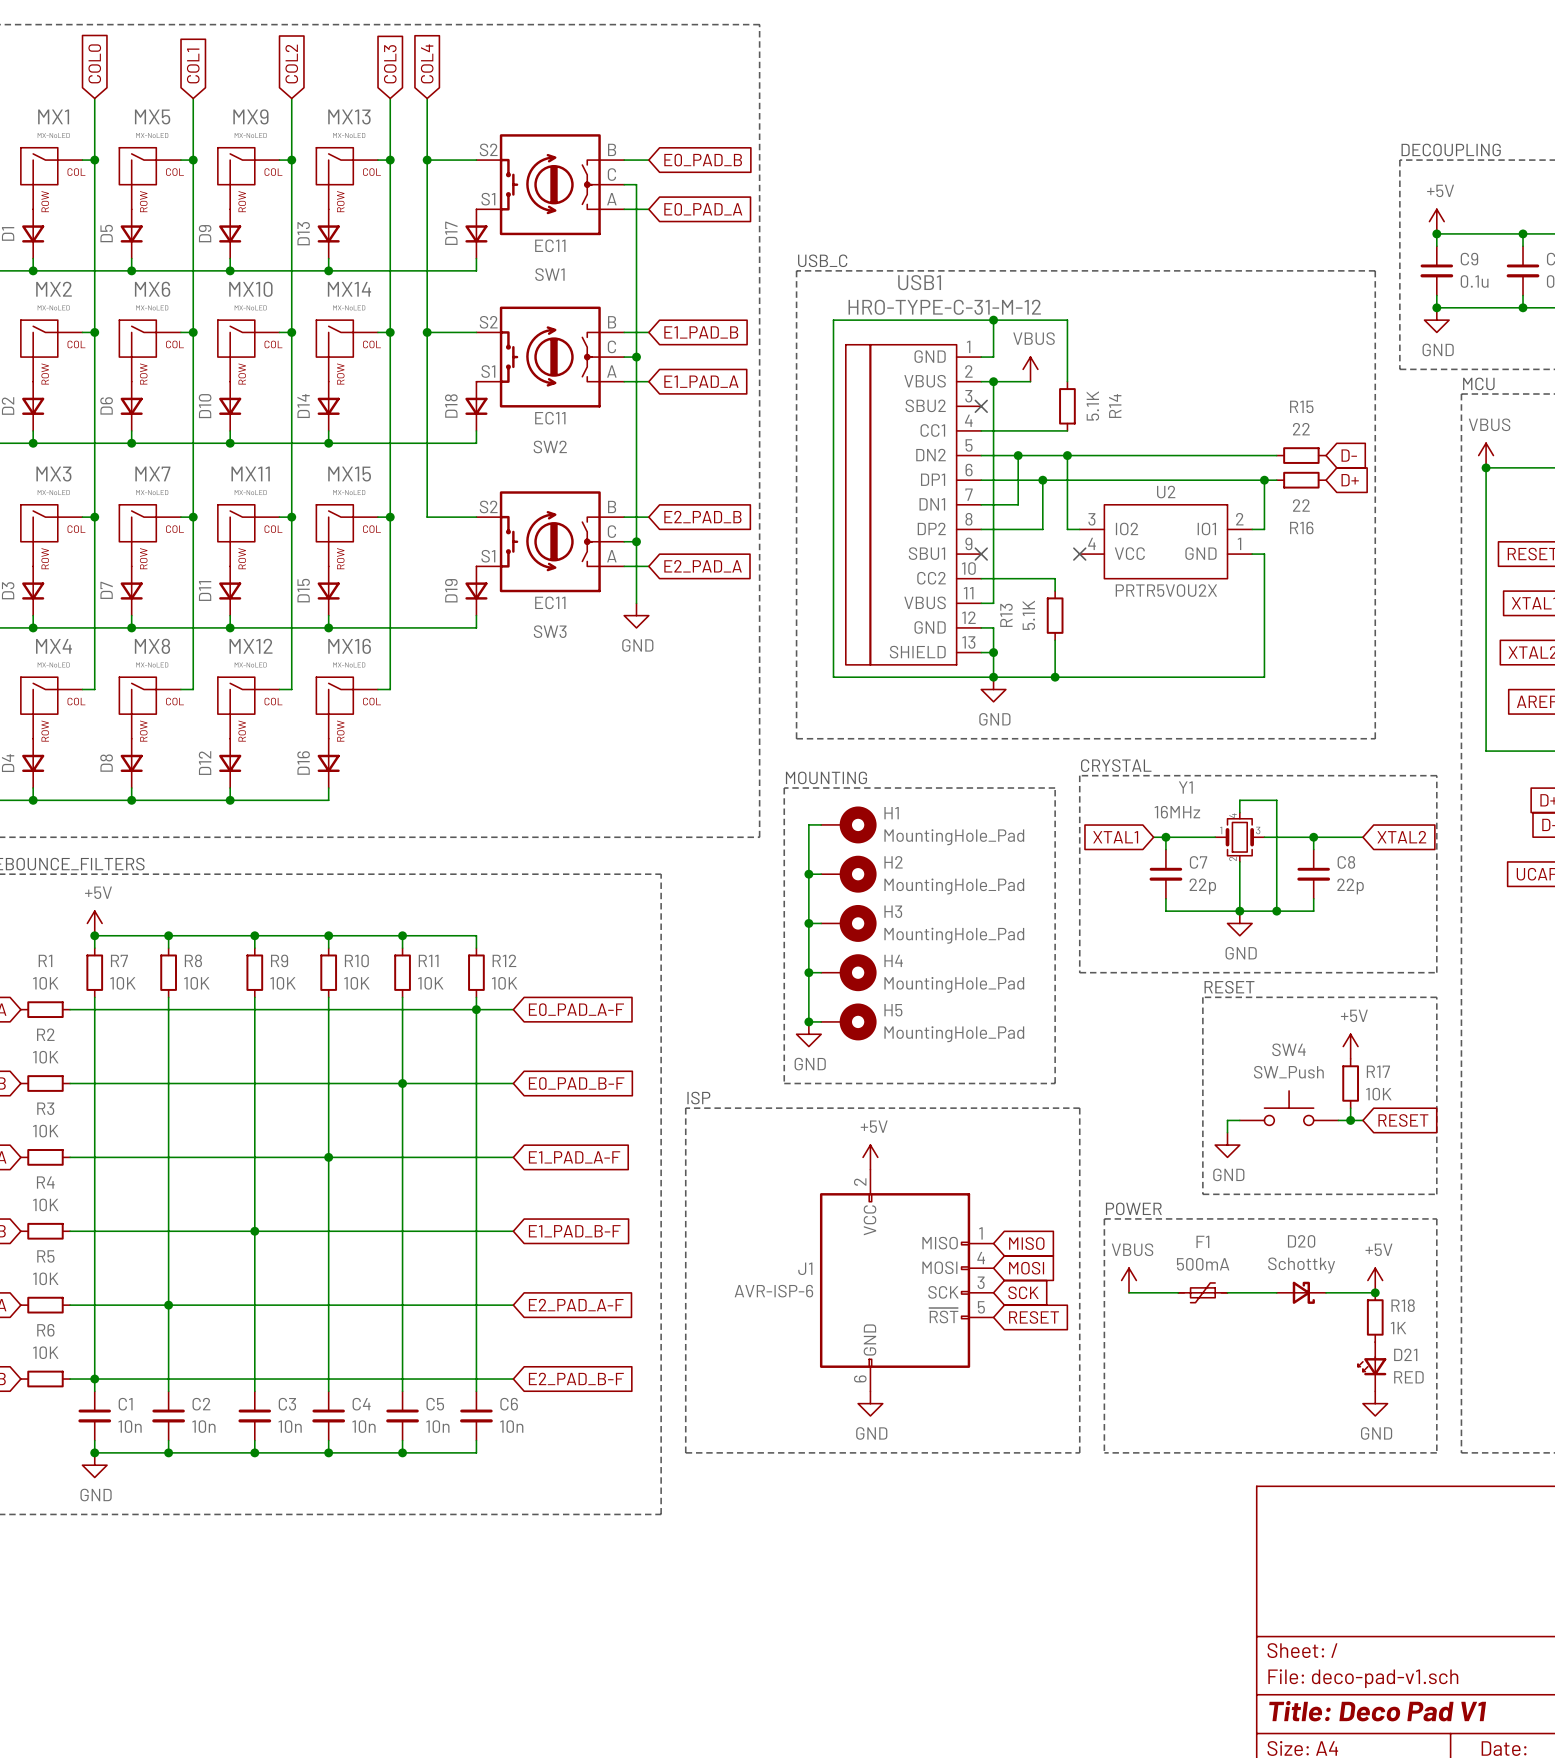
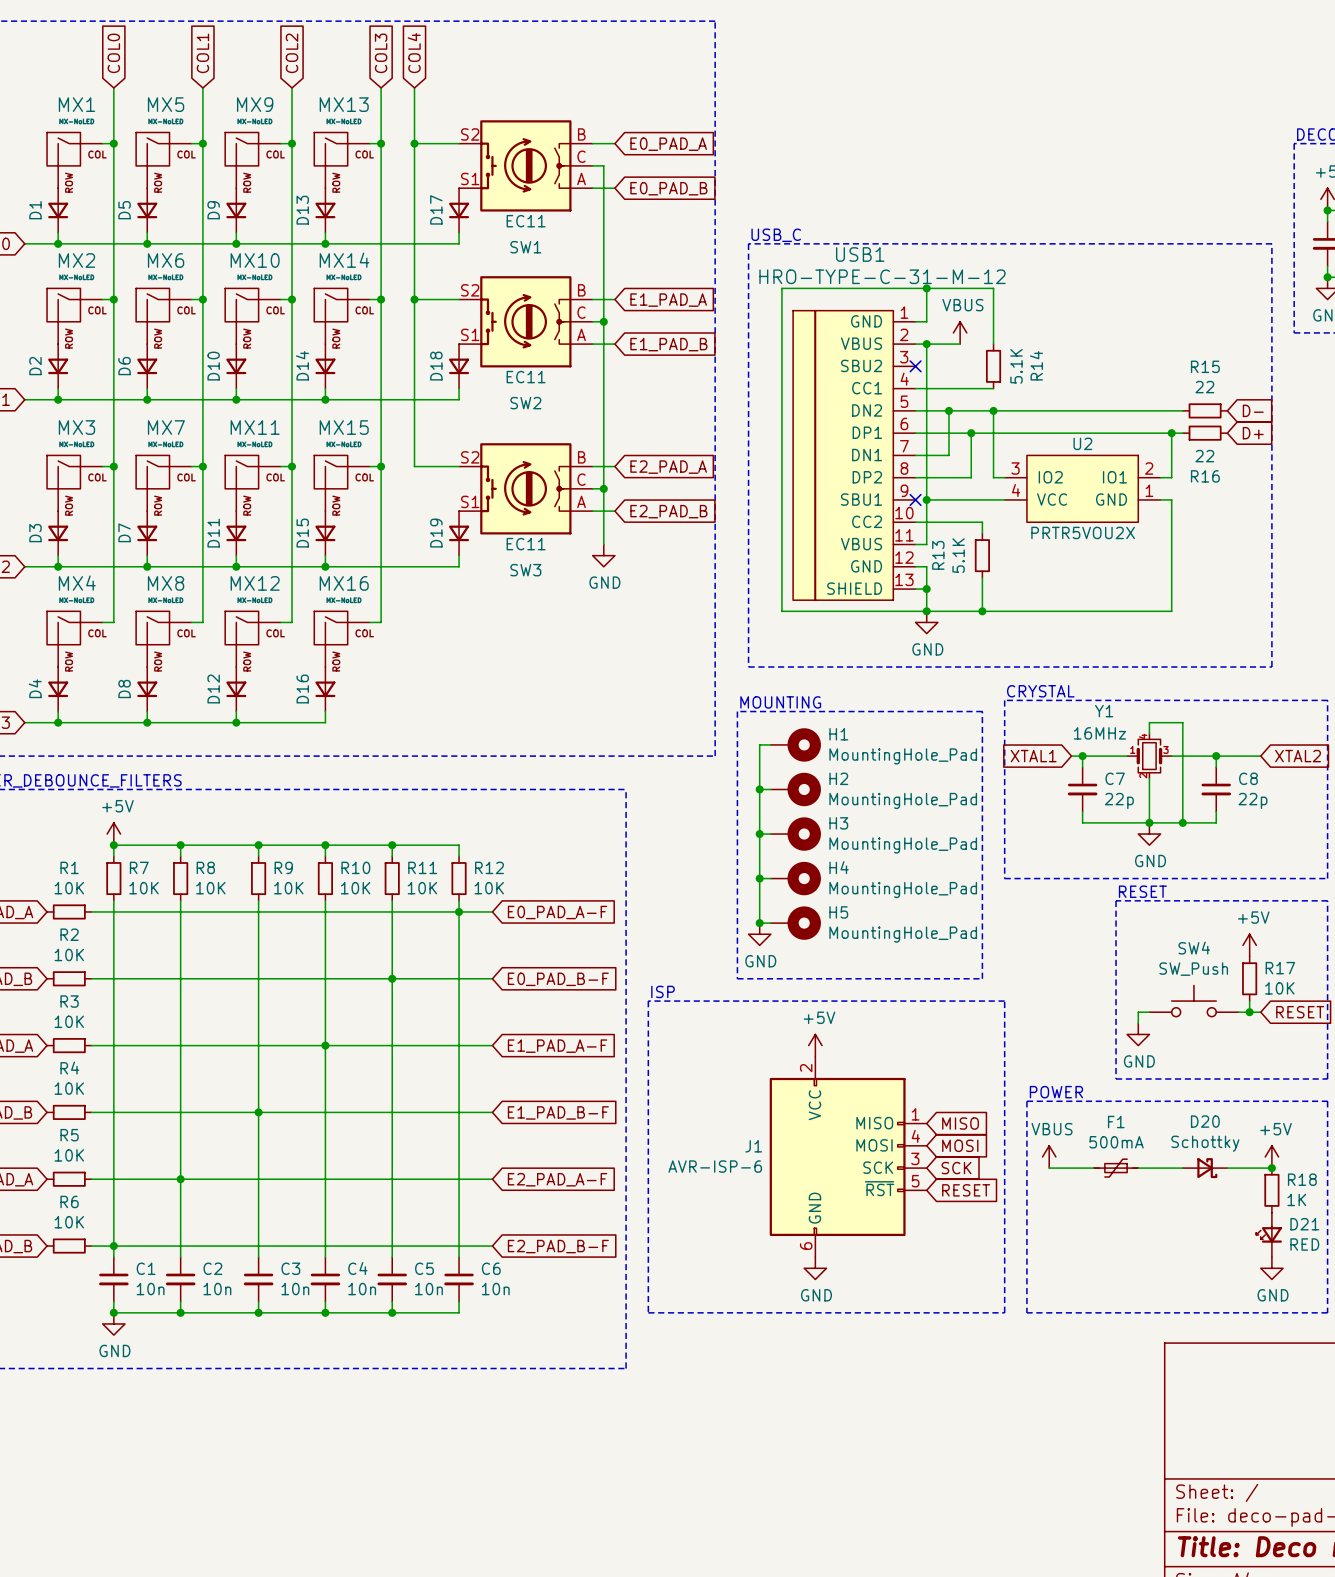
global label: E0_PAD_B (703, 160) -> E0_PAD_A (668, 144)
global label: E0_PAD_A (703, 209) -> E0_PAD_B (668, 188)
global label: E1_PAD_B (701, 332) -> E1_PAD_A (668, 300)
global label: E1_PAD_A (701, 381) -> E1_PAD_B (668, 344)
global label: E2_PAD_B (702, 517) -> E2_PAD_A (668, 467)
wire: none -> (926, 499) (1004, 499)
junction: none -> (926, 499)
no-connect mark: (1079, 554) -> none
global label: E2_PAD_A (703, 566) -> E2_PAD_B (668, 511)

